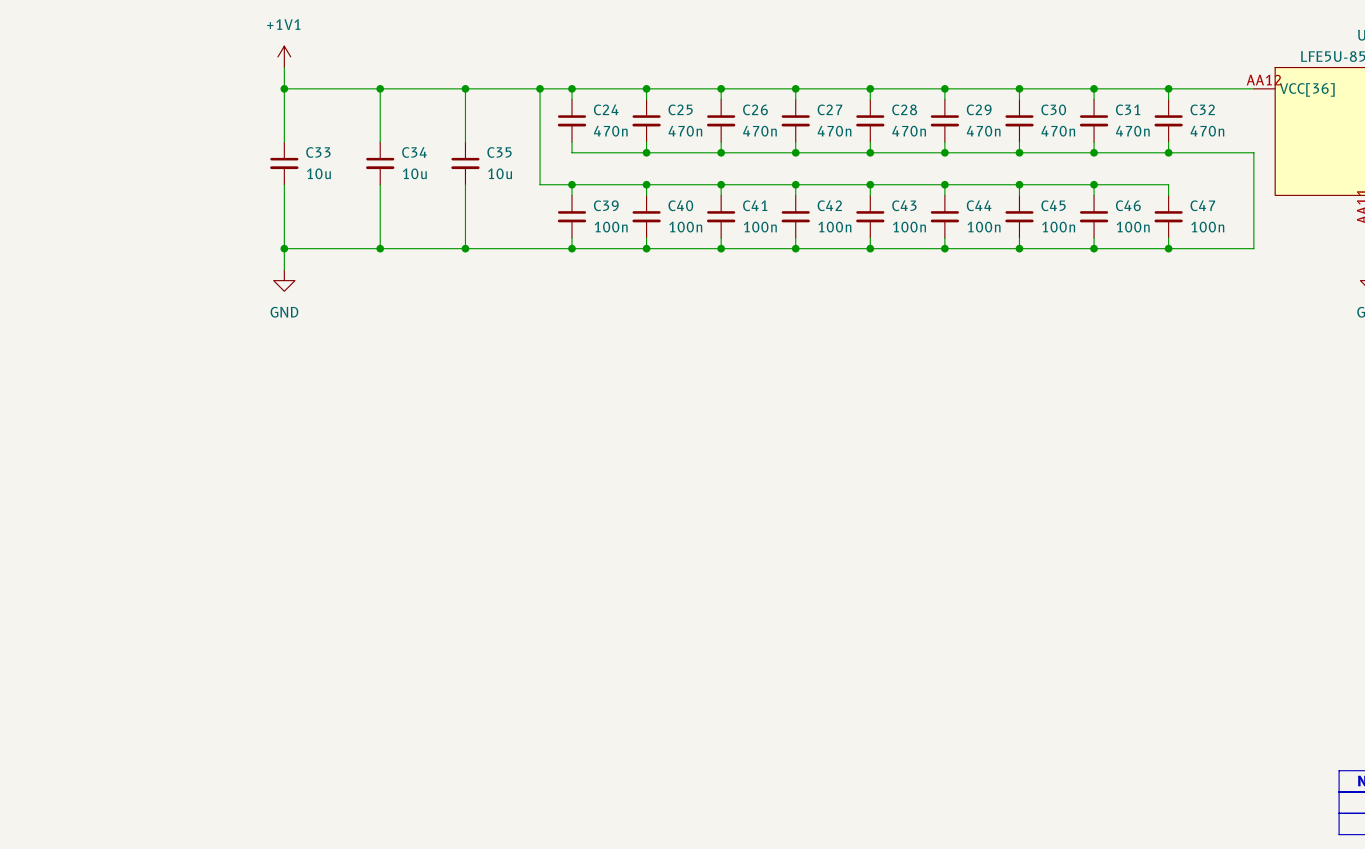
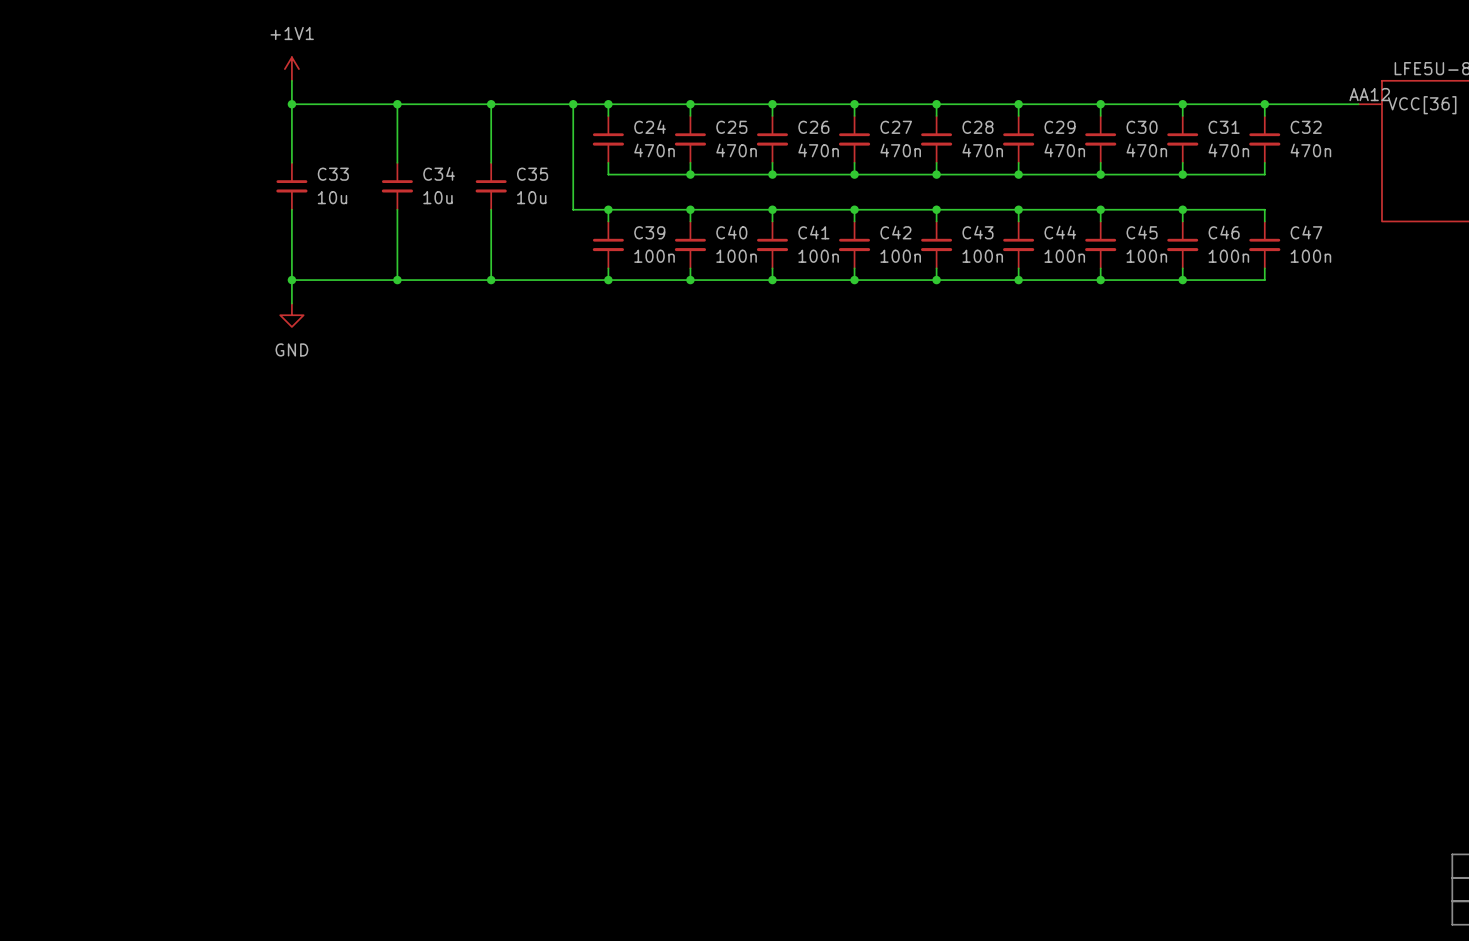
wire: (1168, 152) (1253, 152) (1253, 248) (1168, 248) -> none
junction: (1168, 152) -> none
junction: (1168, 248) -> none

